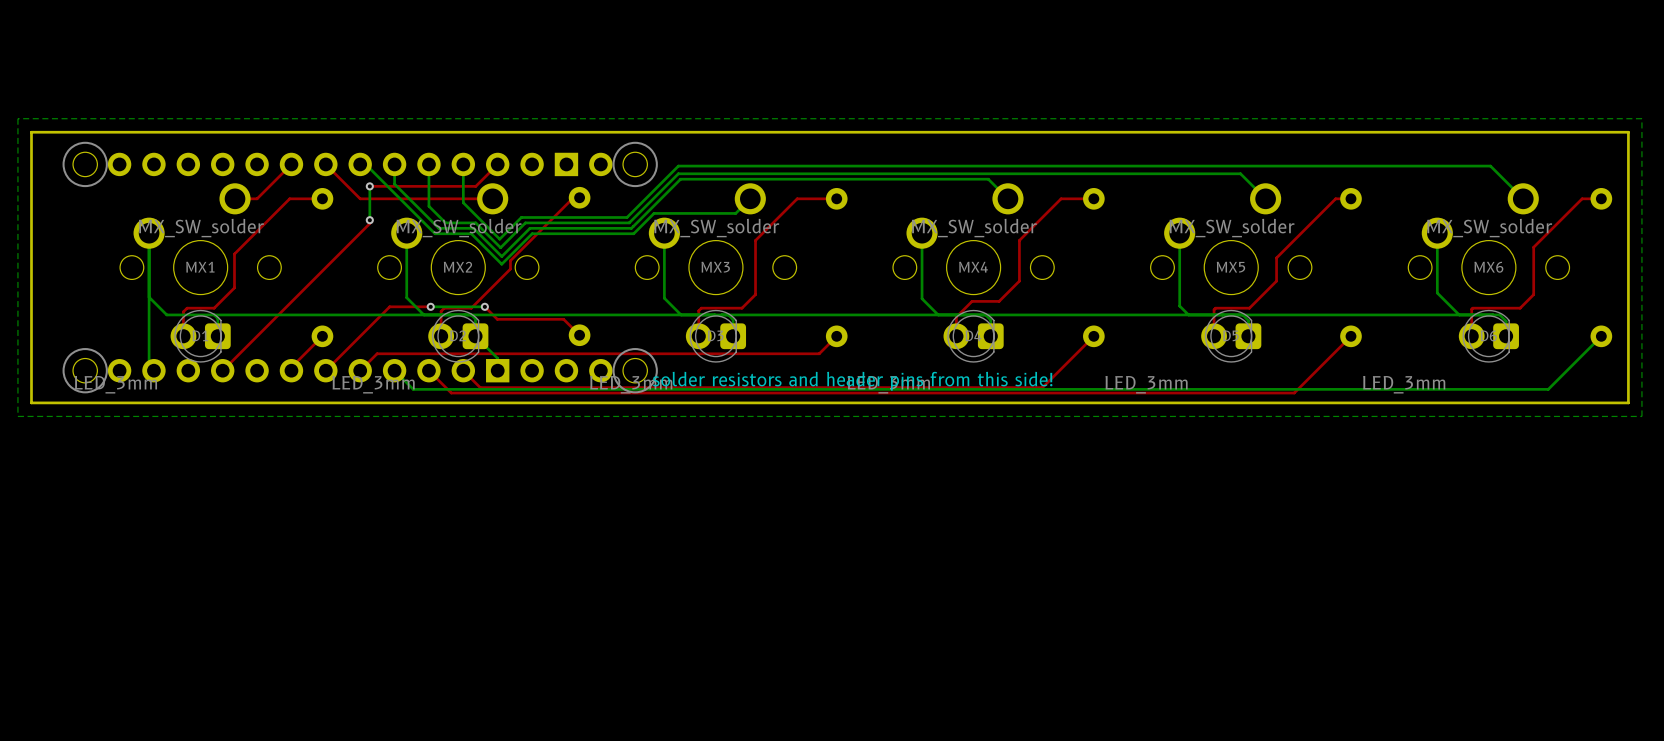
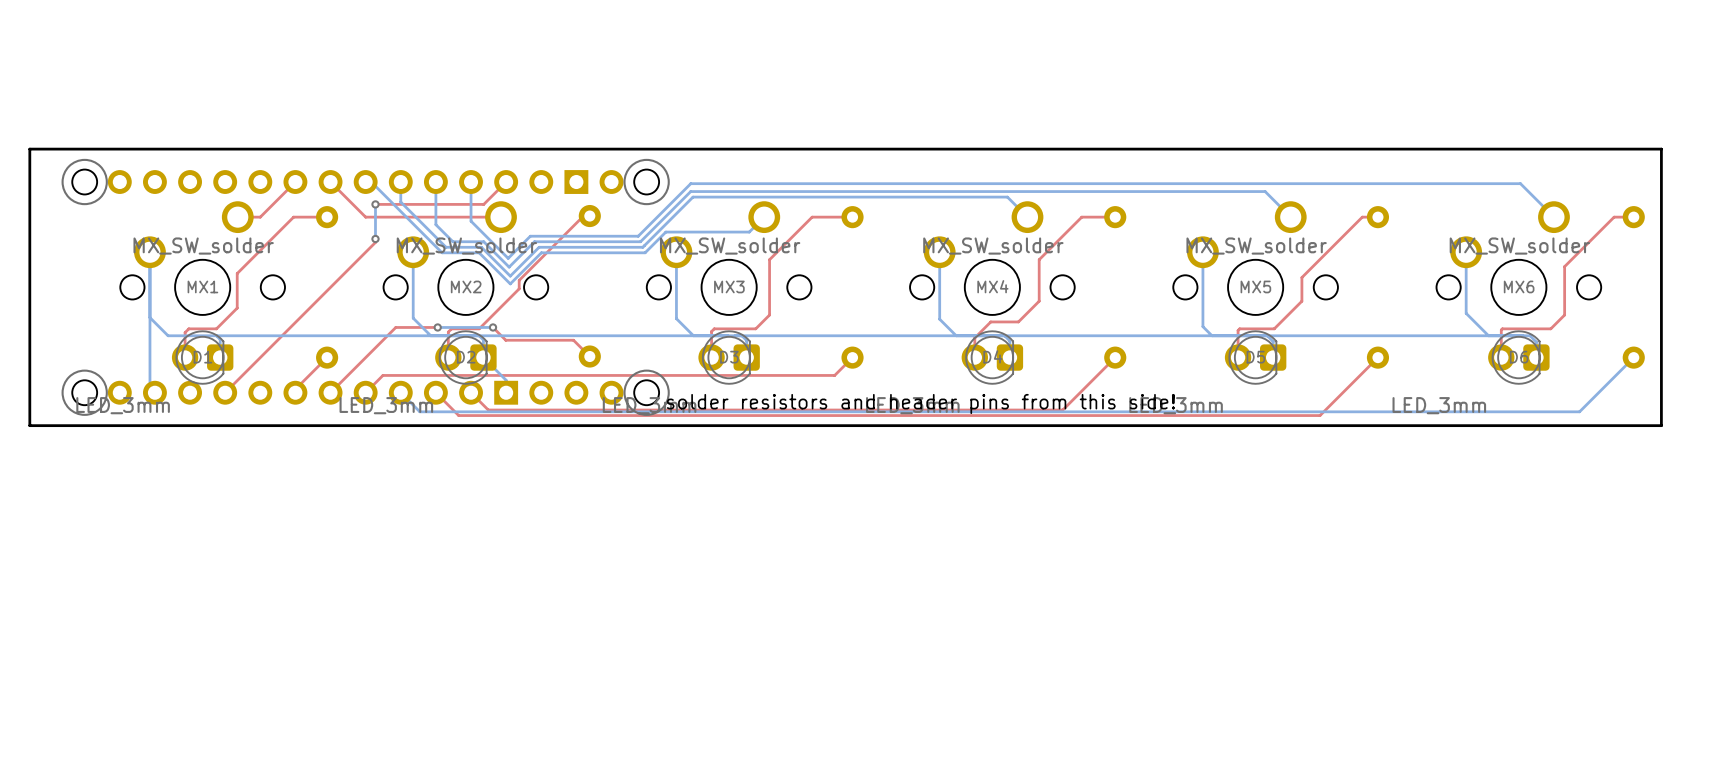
bottom zone outline: (1641, 118) (1641, 416) (17, 416) (17, 118) (1641, 118) -> none

